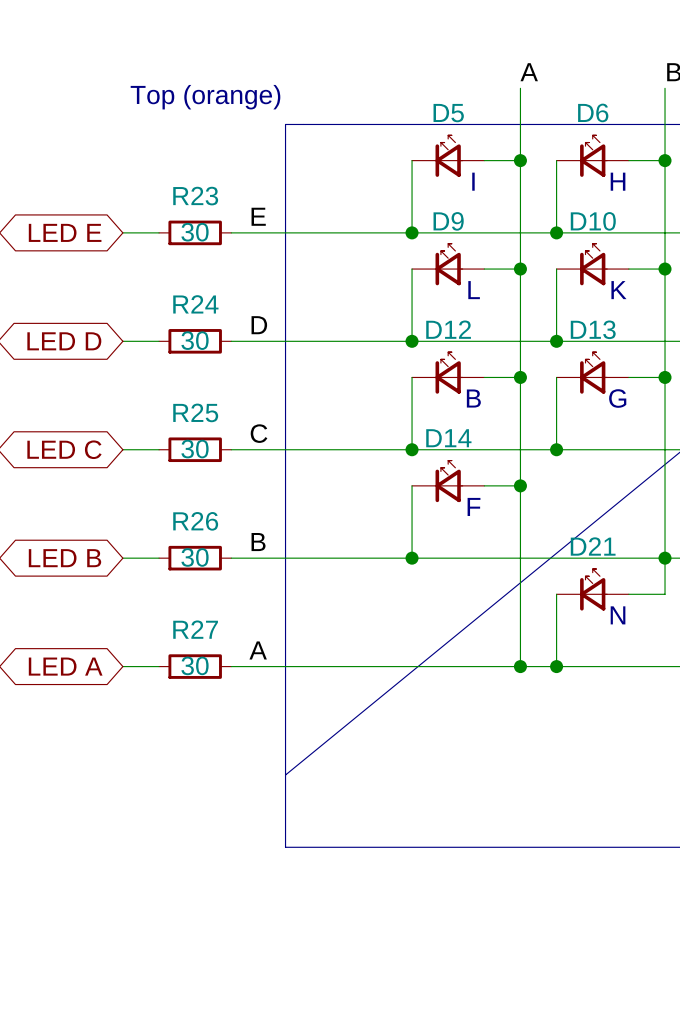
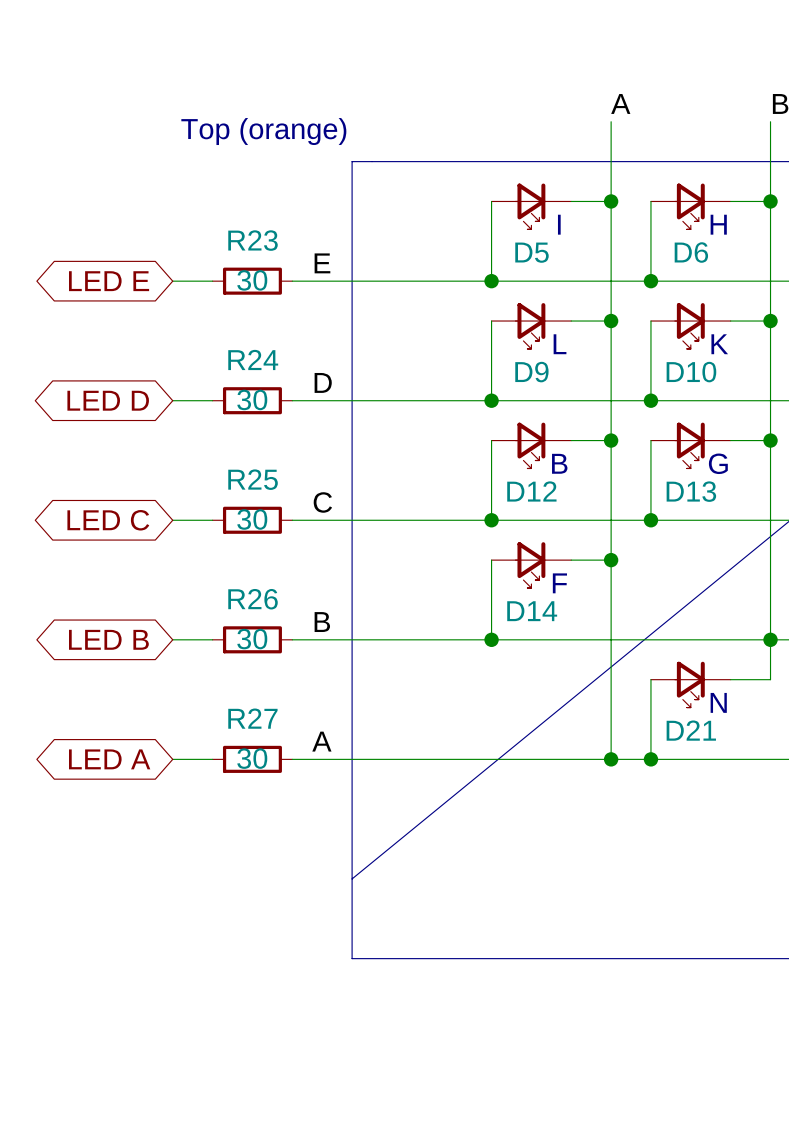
D5 rotation: 0° (449, 156) -> 180° (530, 206)
D6 rotation: 0° (593, 156) -> 180° (689, 206)
D9 rotation: 0° (449, 264) -> 180° (530, 325)
D10 rotation: 0° (593, 264) -> 180° (689, 325)
D12 rotation: 0° (449, 372) -> 180° (530, 445)
D13 rotation: 0° (593, 372) -> 180° (689, 445)
D14 rotation: 0° (449, 481) -> 180° (530, 565)
D21 rotation: 0° (593, 589) -> 180° (689, 684)

